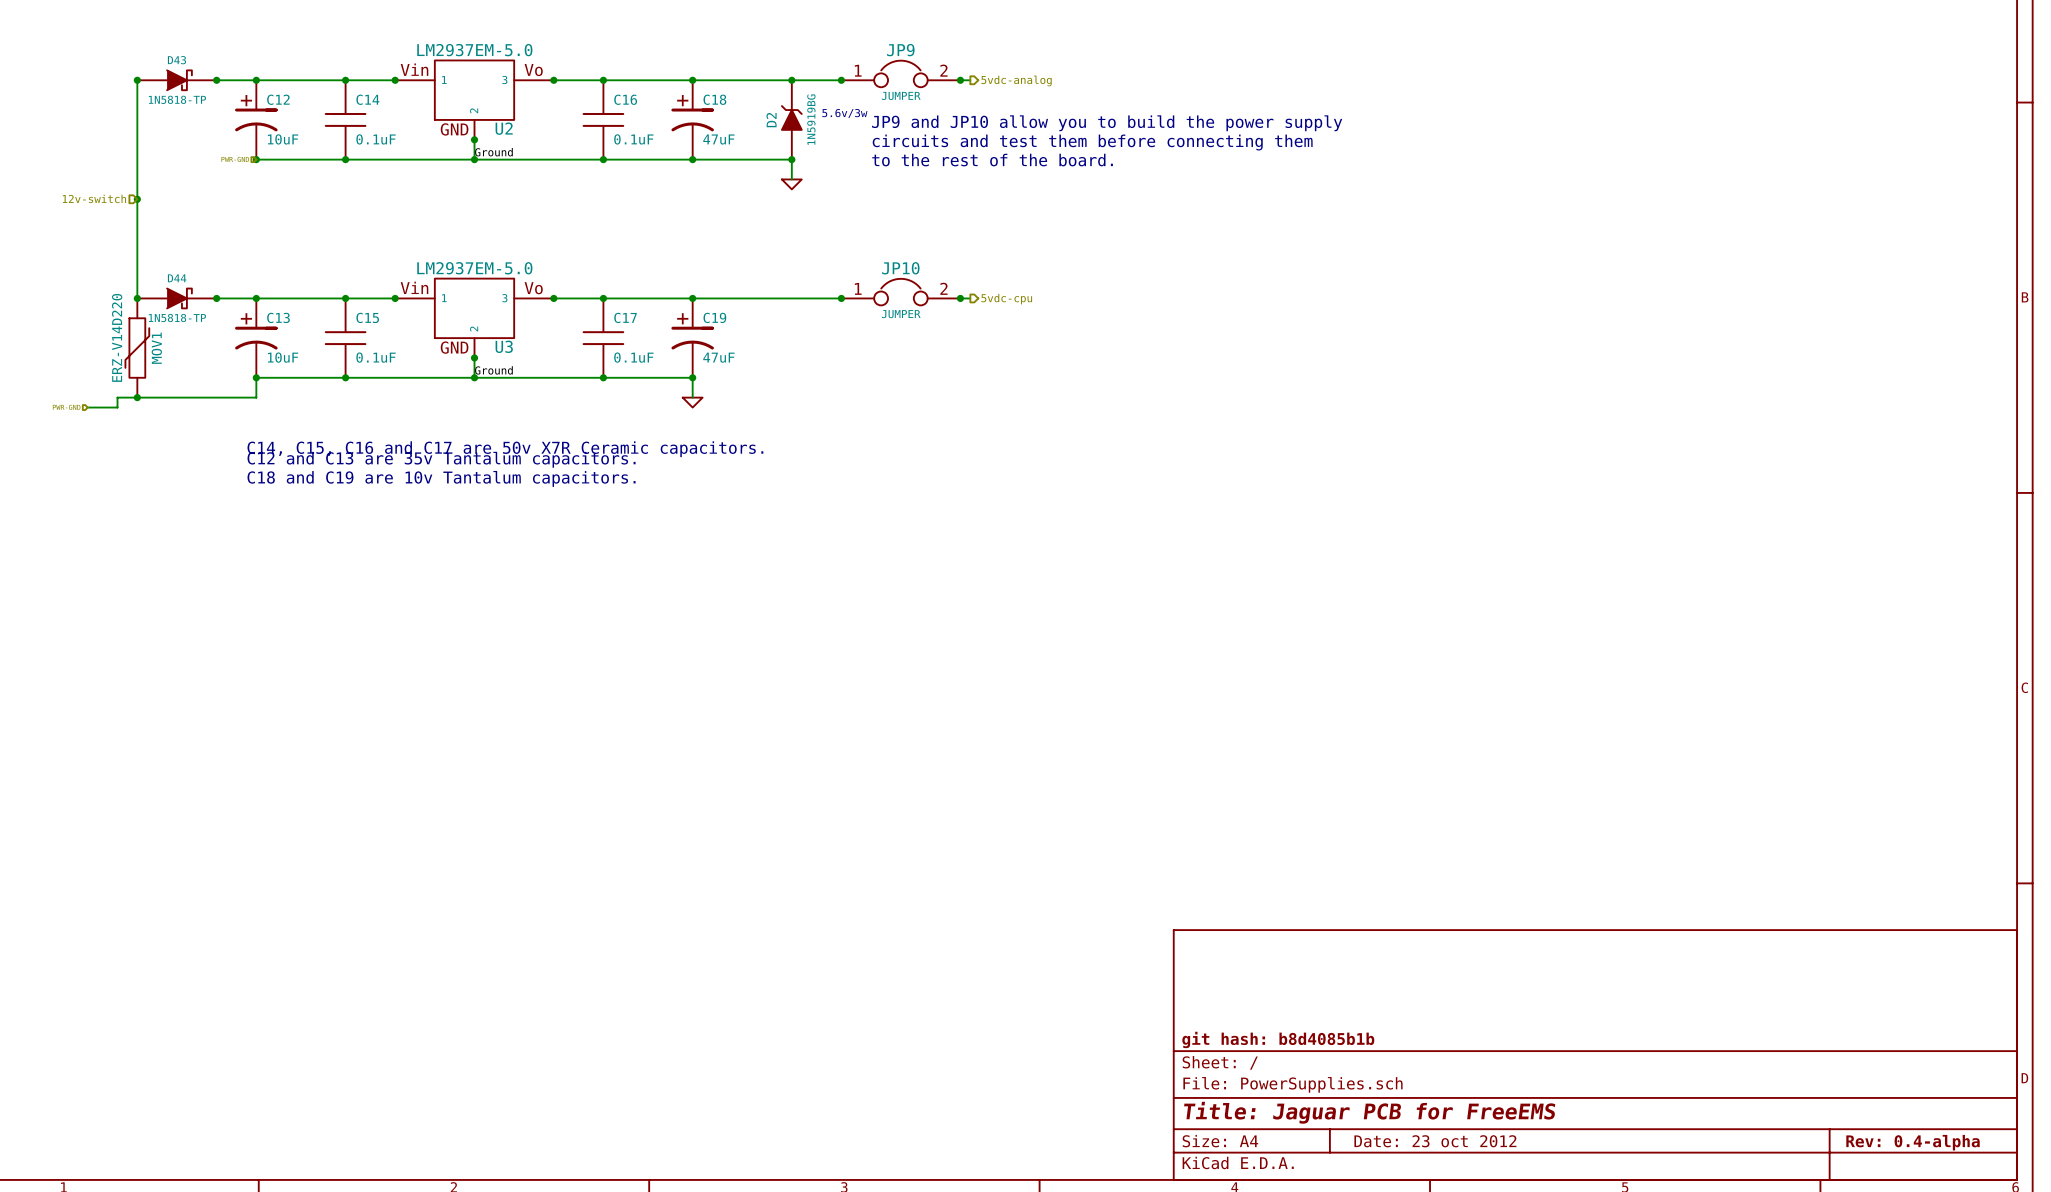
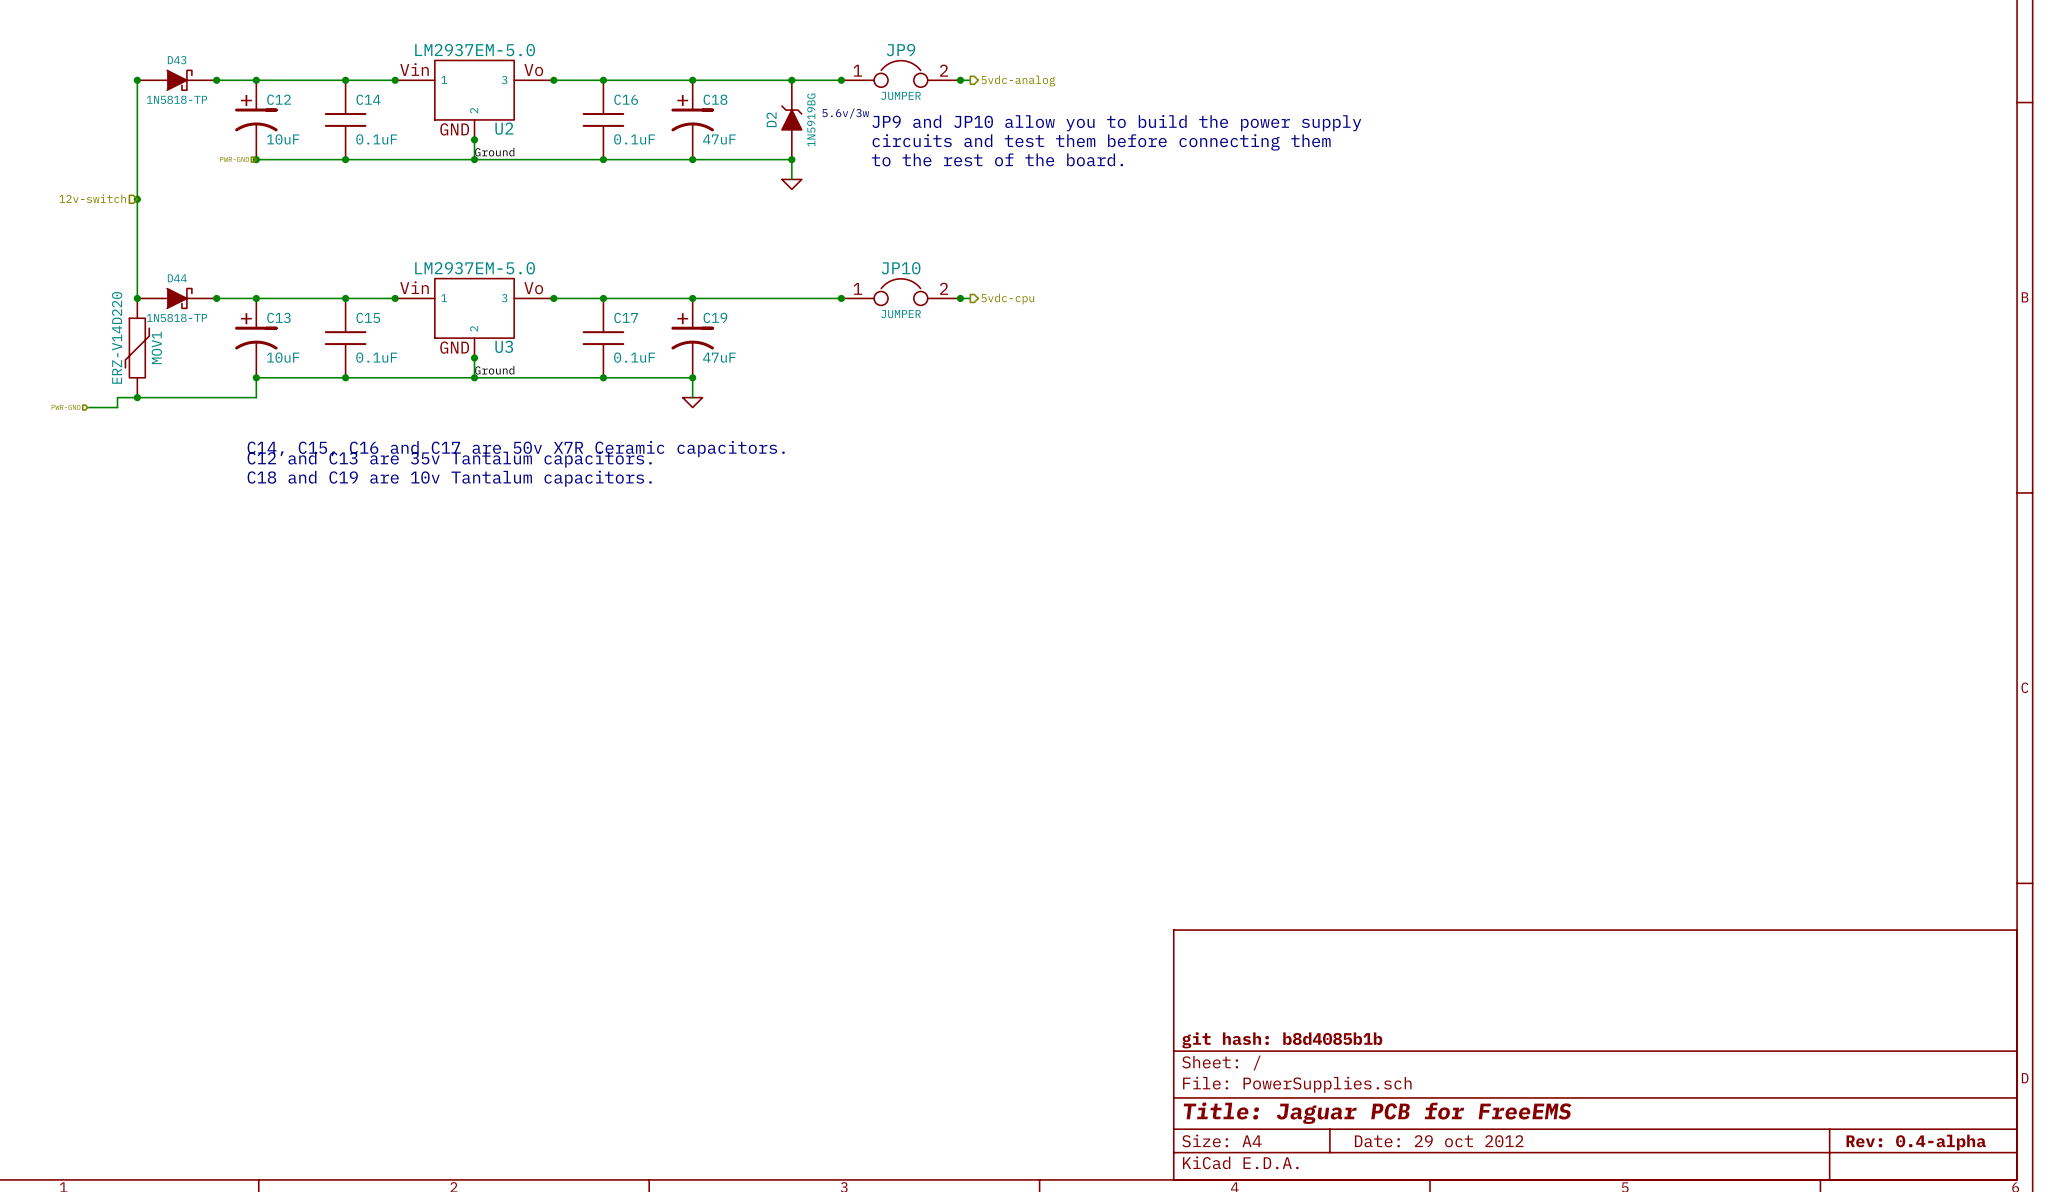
title block: Date: 23 oct 2012 (1435, 1141) -> Date: 29 oct 2012 (1439, 1141)

